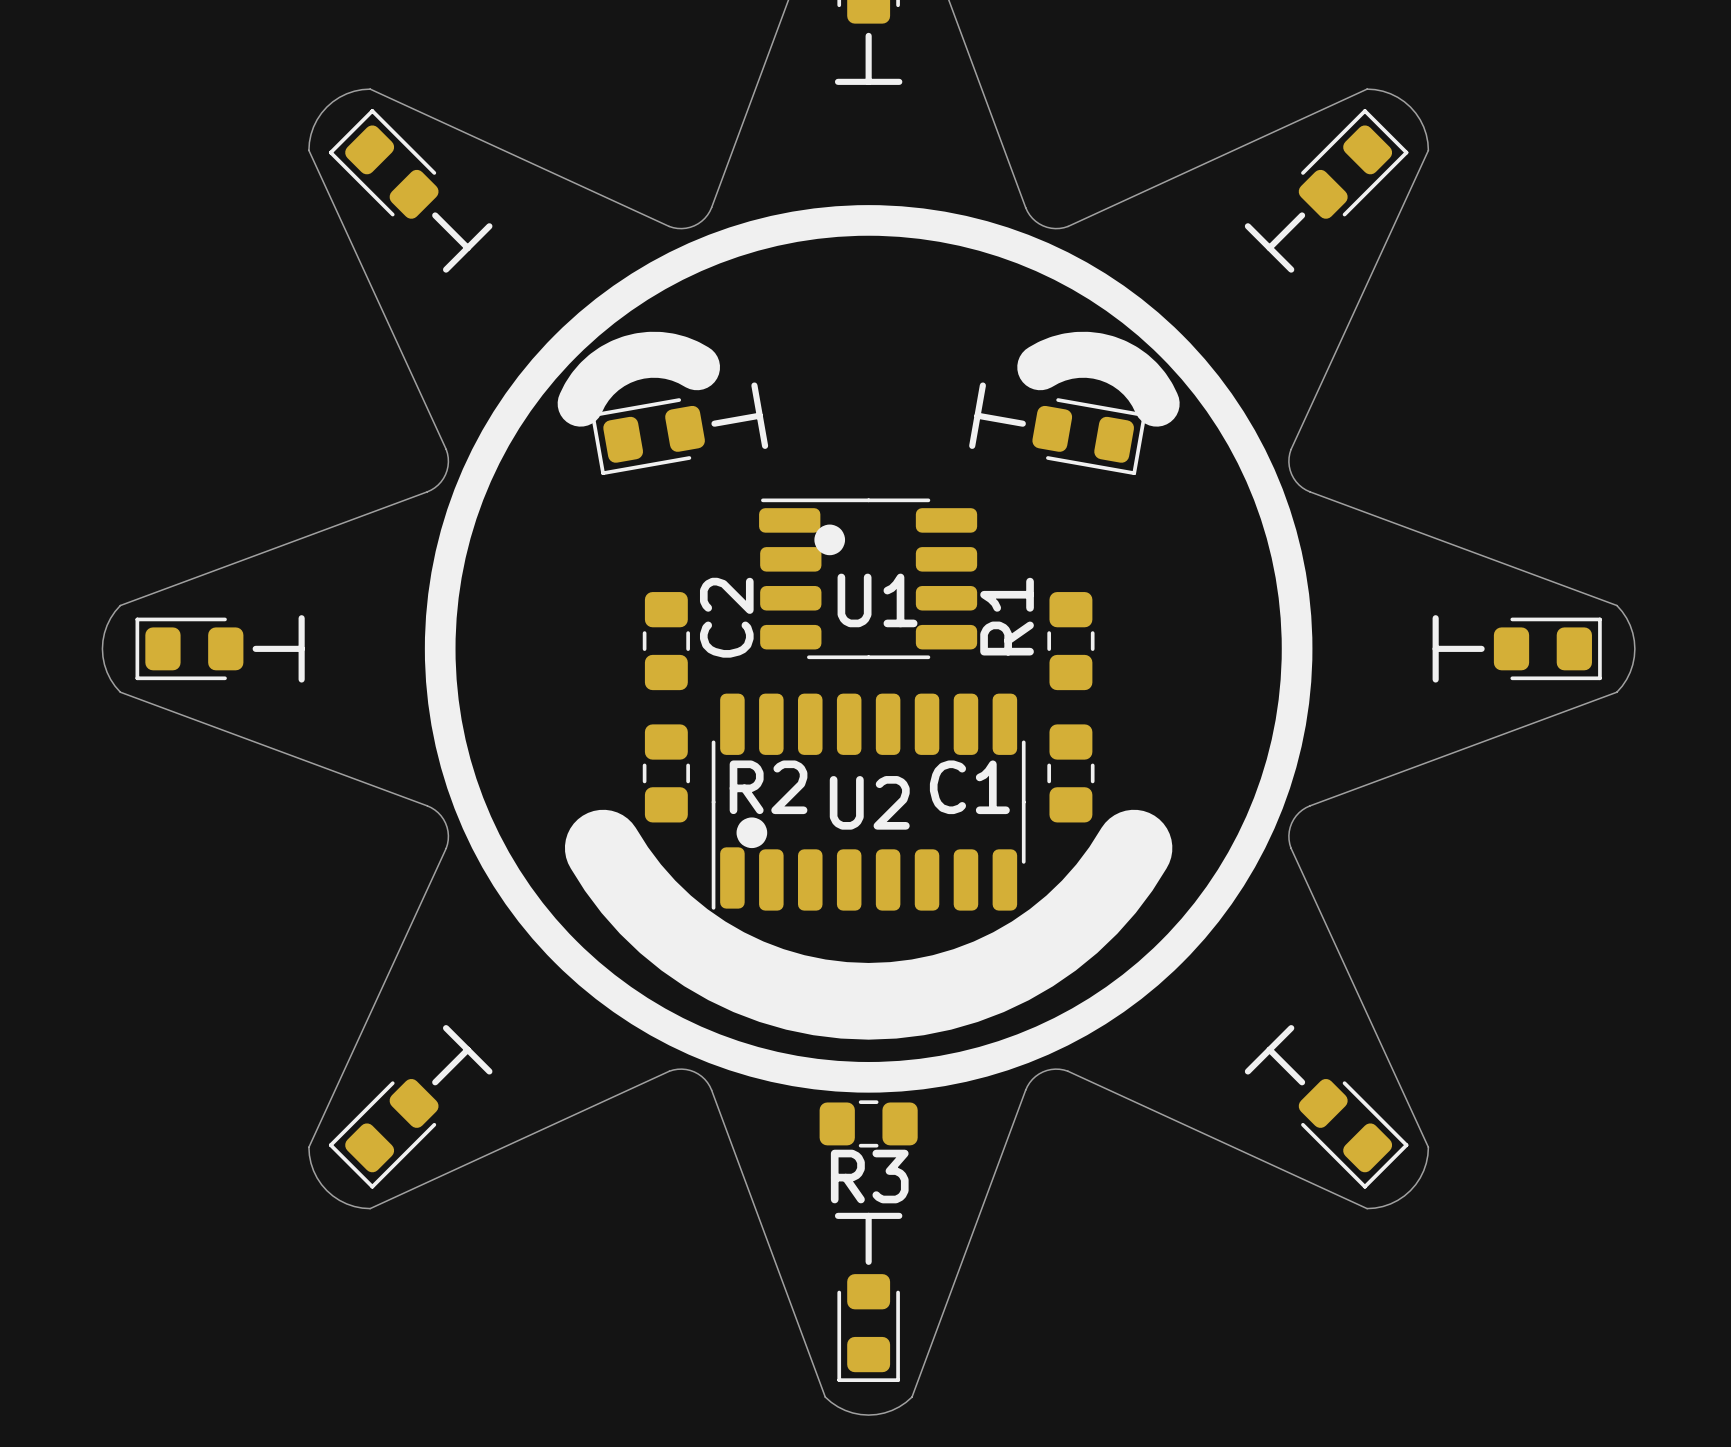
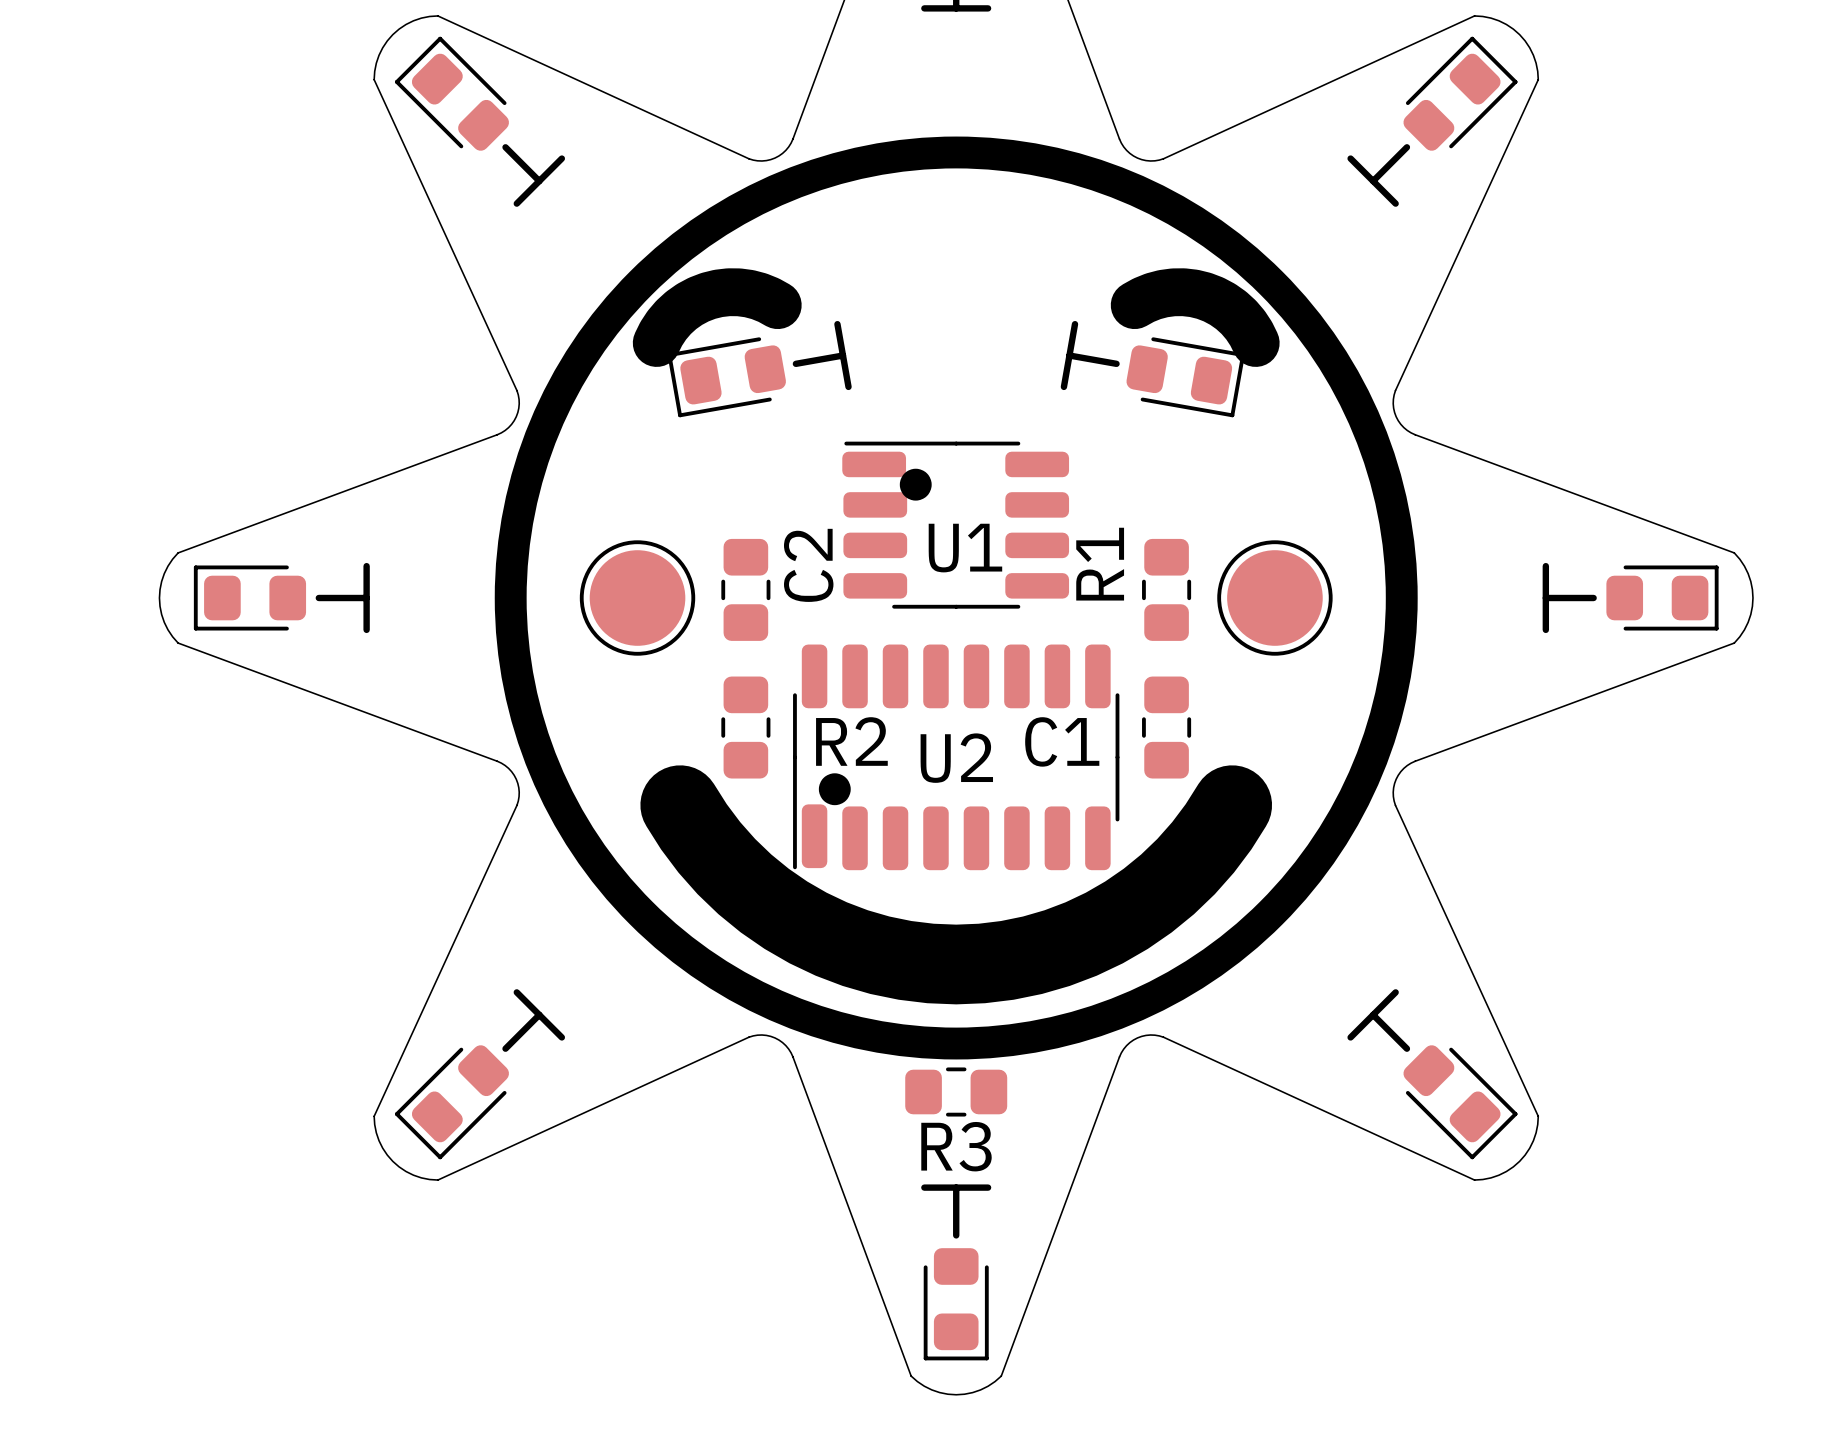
part: none -> (637, 598)
part: none -> (1274, 598)

